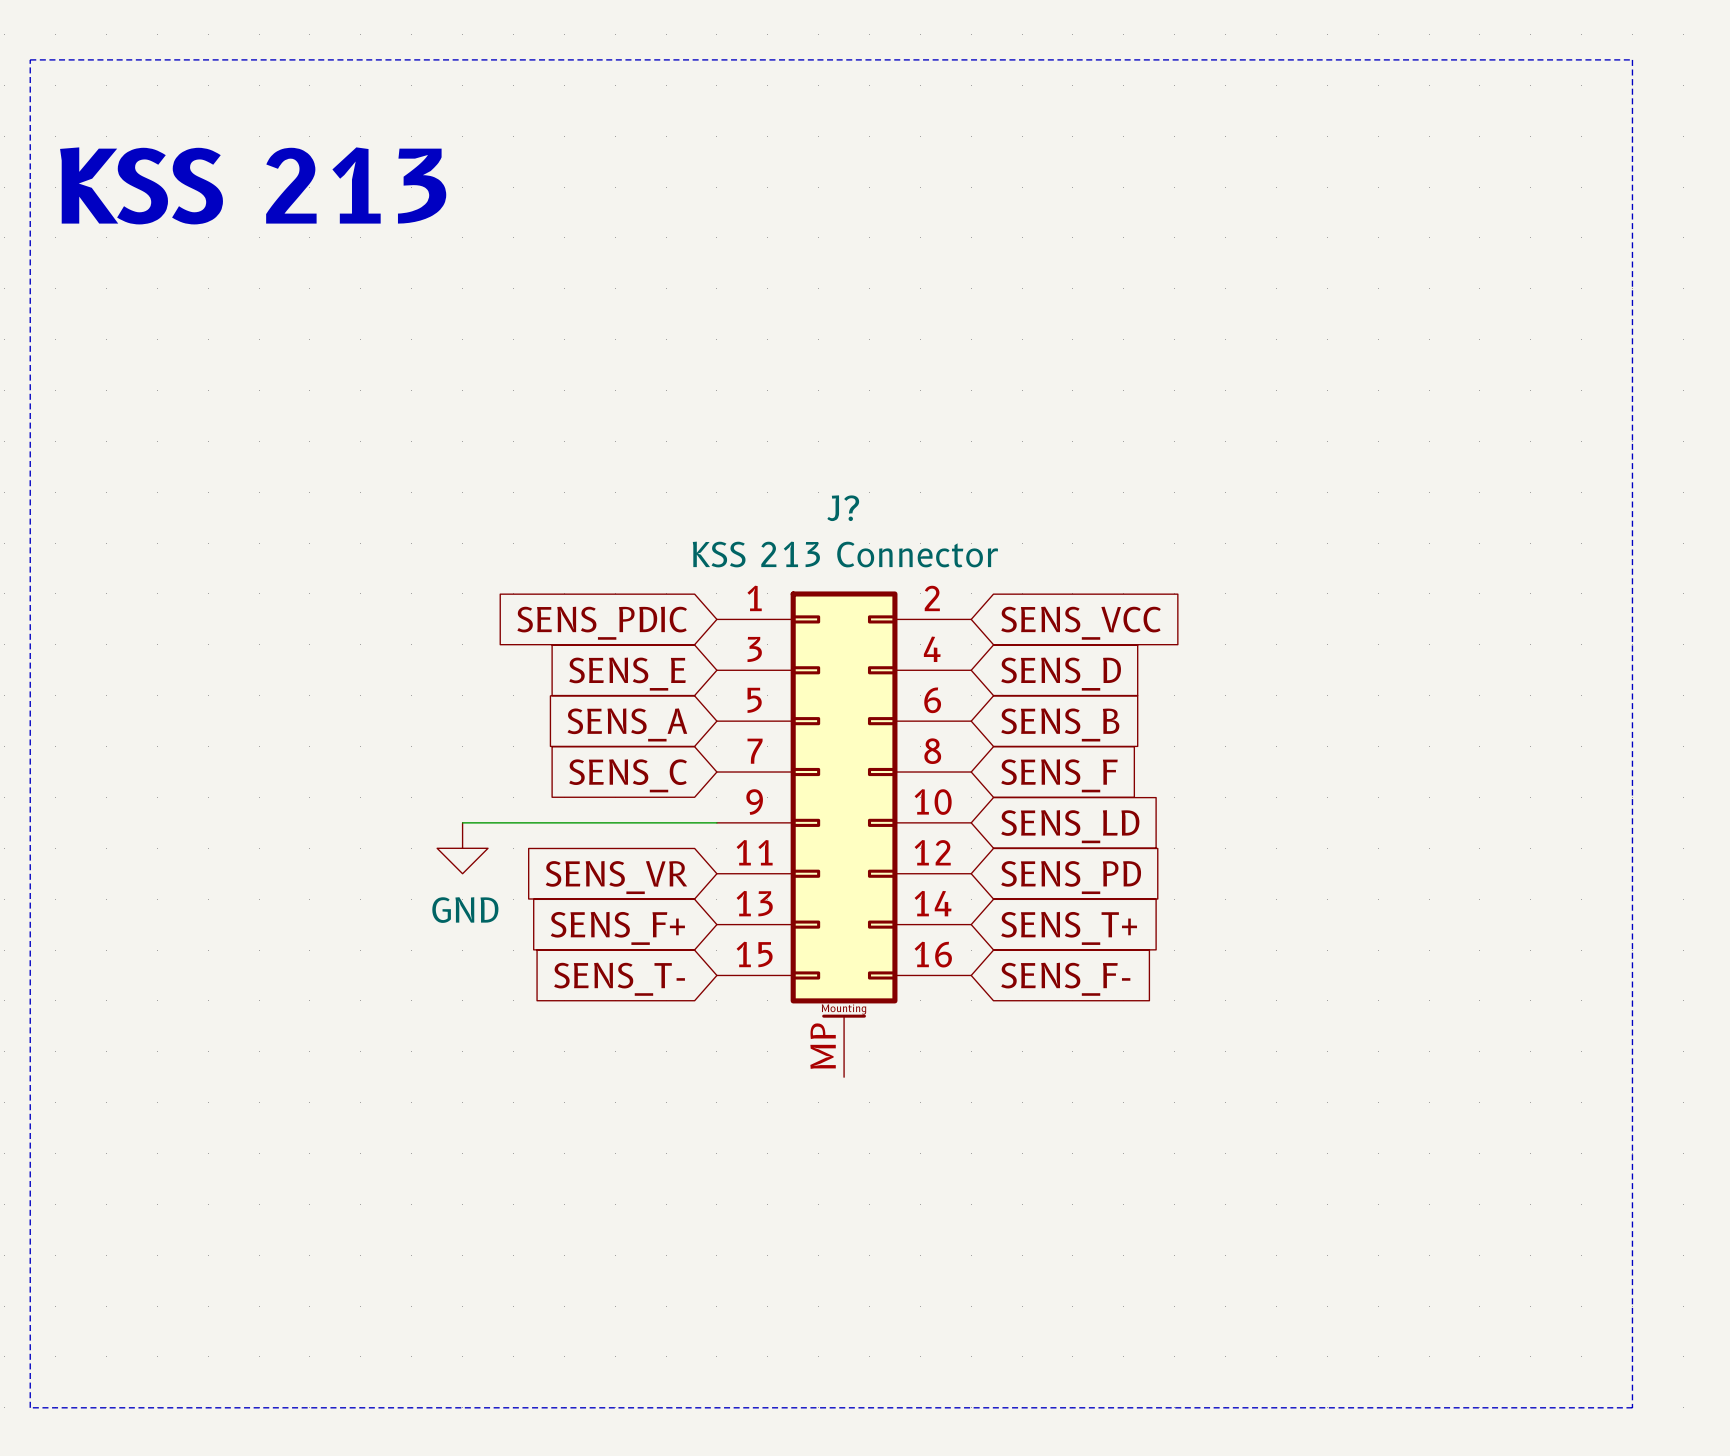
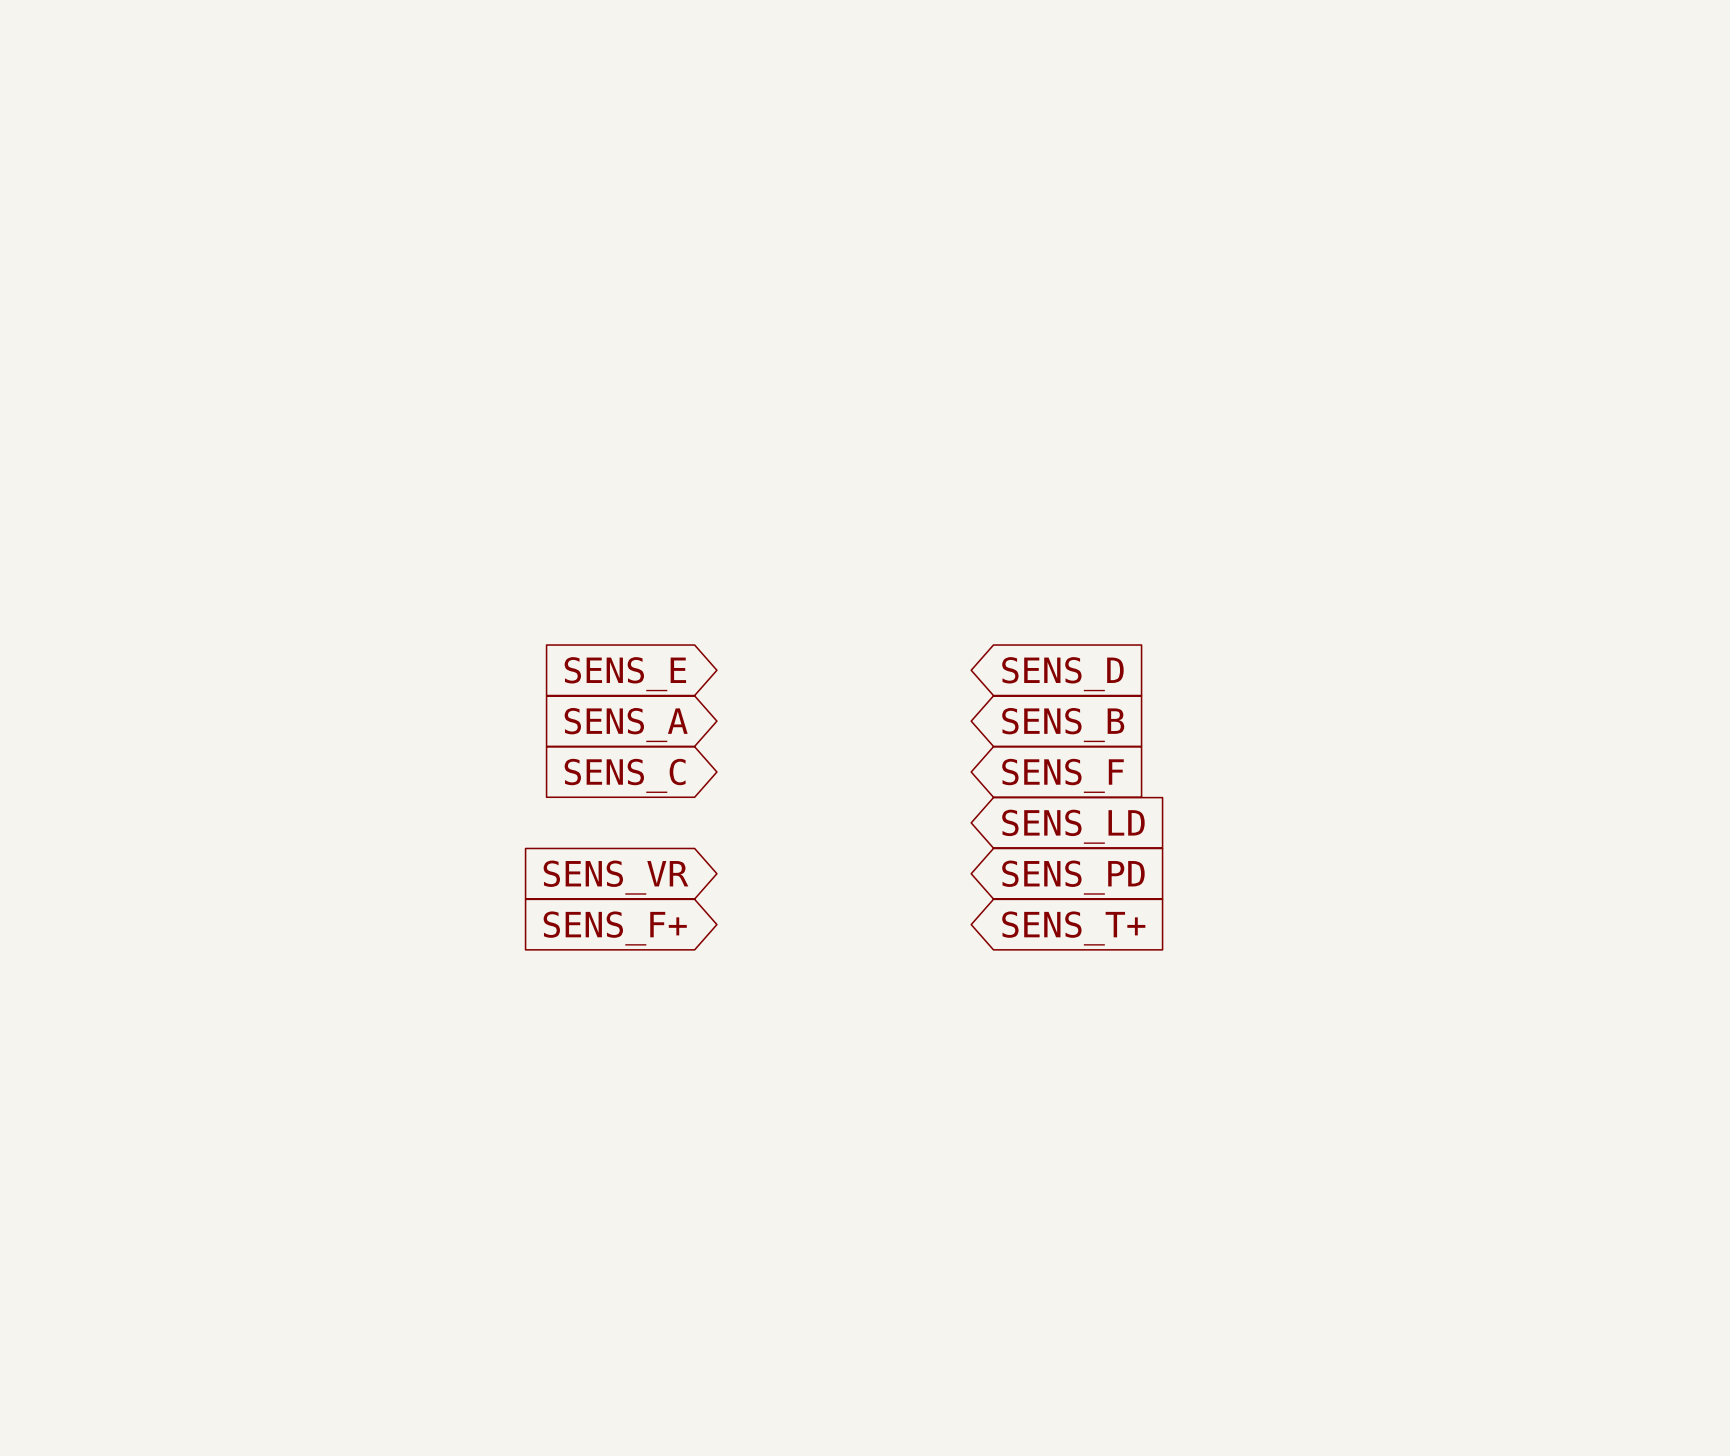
line: (30, 59) (1632, 59) (1632, 1407) (30, 1407) (30, 59) -> none
text: KSS 213 (253, 185) -> none
global label: SENS_PDIC (602, 623) -> none
global label: SENS_VCC (1081, 623) -> none
wire: (462, 822) (716, 822) -> none
J?: KSS 213 Connector (844, 834) -> none
power symbol: GND (462, 848) -> none
global label: SENS_T- (619, 979) -> none
global label: SENS_F- (1065, 979) -> none

